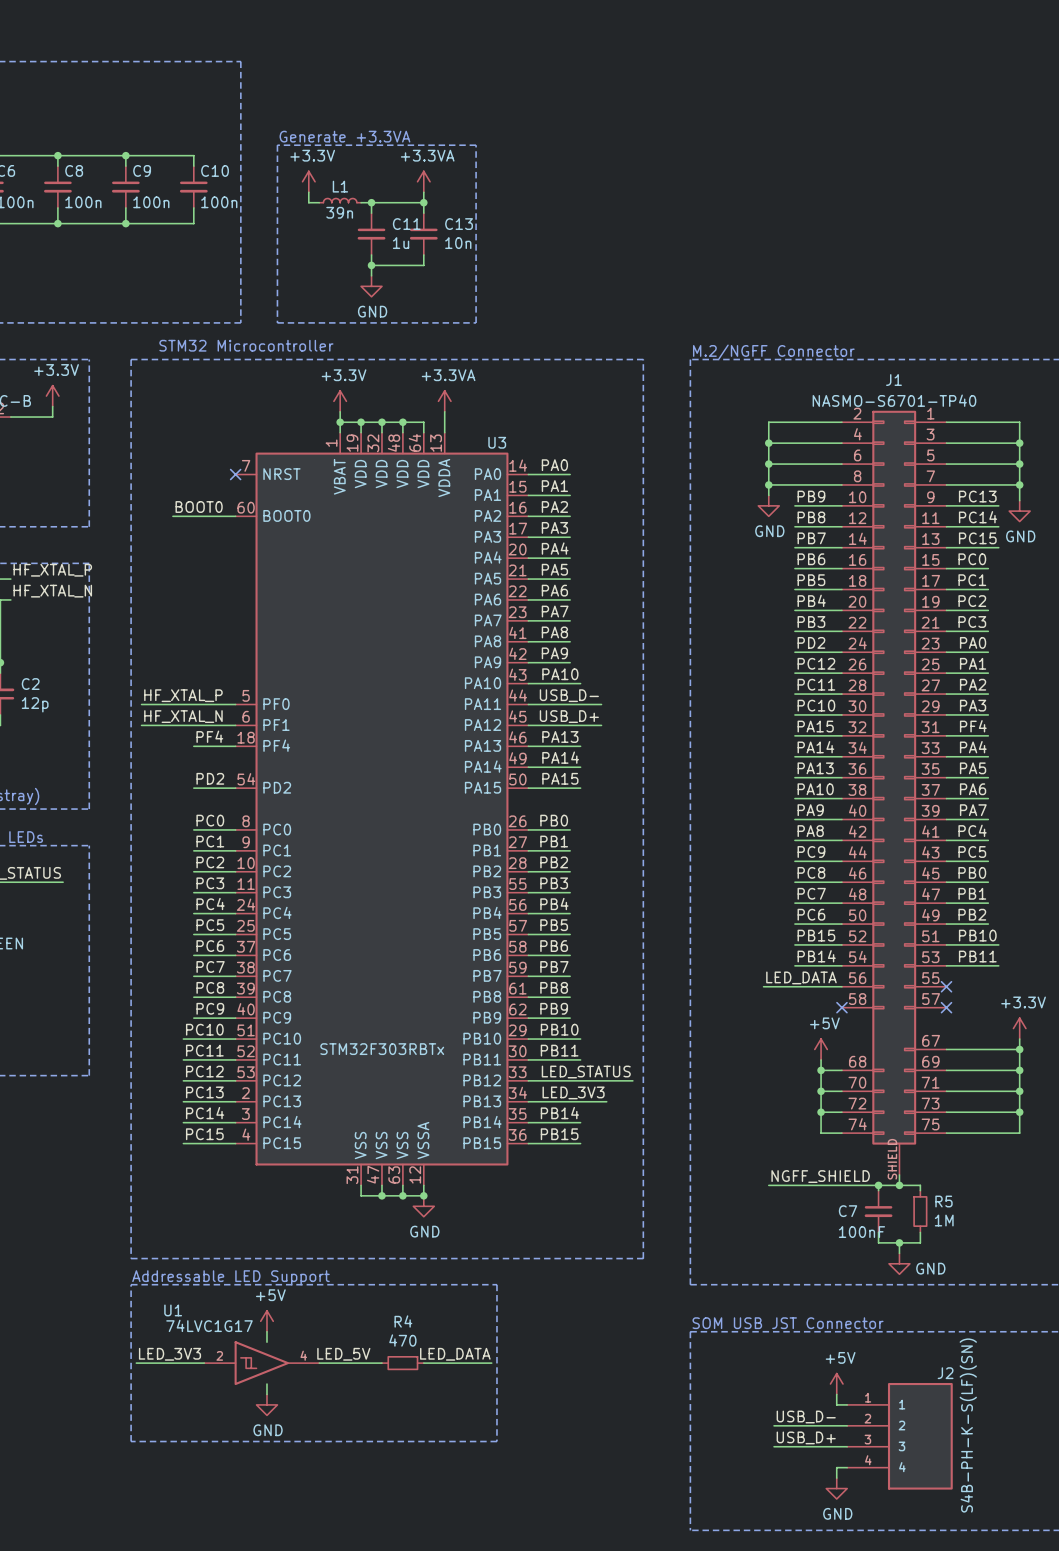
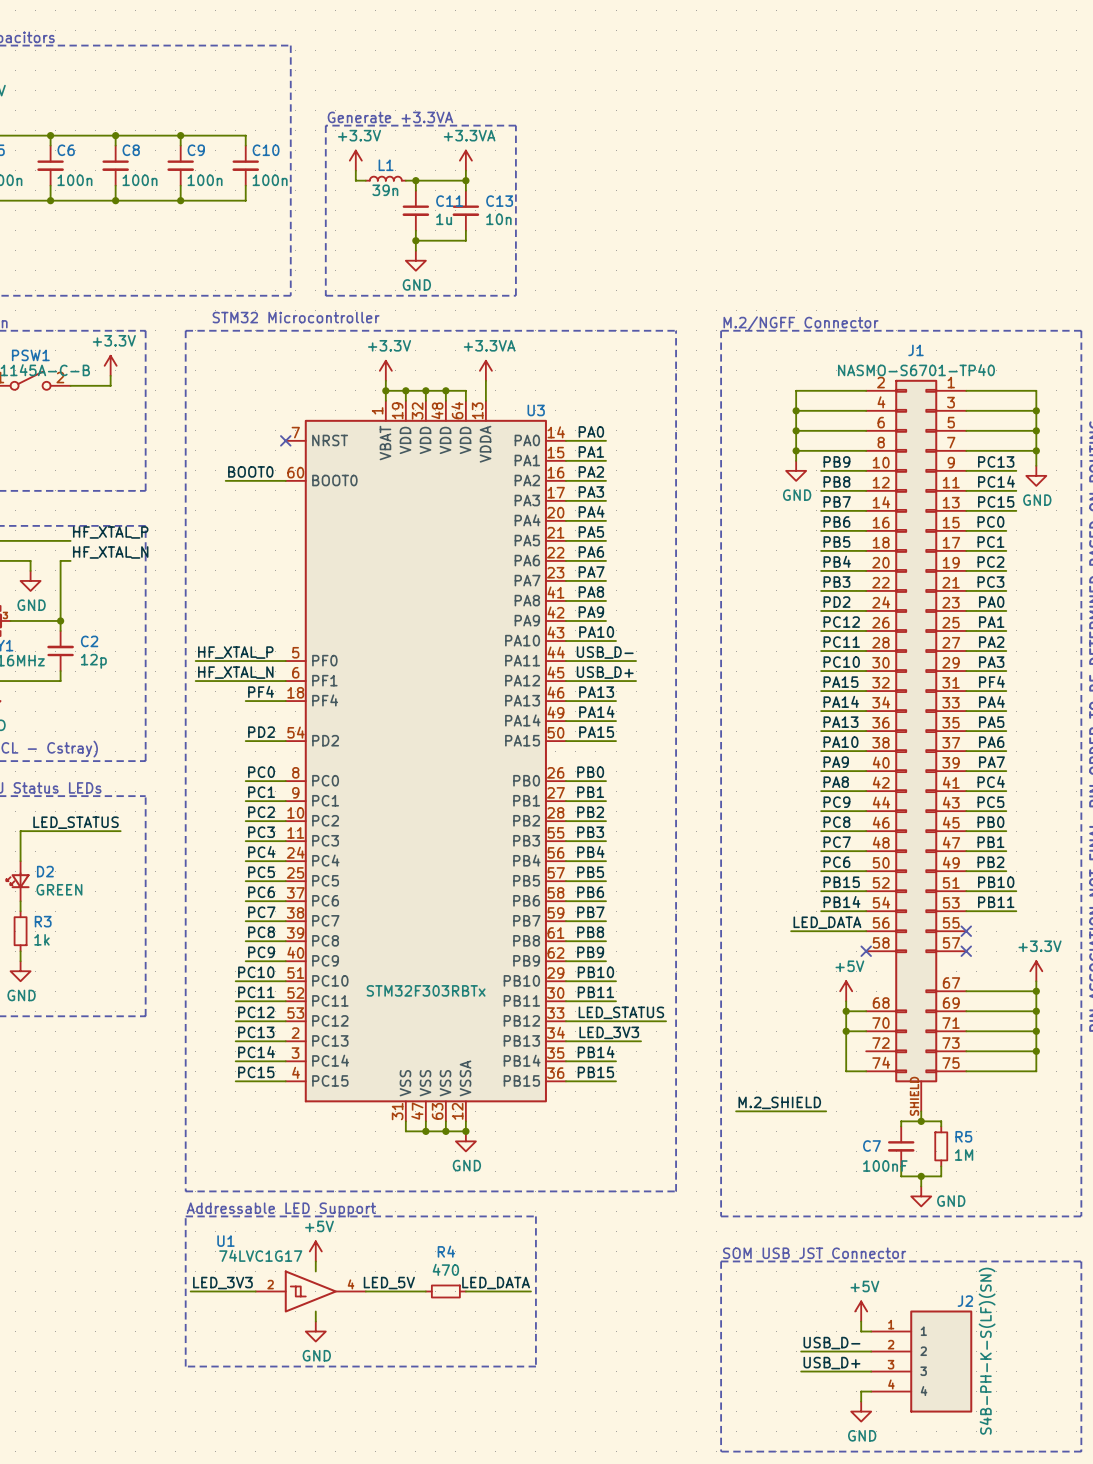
wire: (821, 1112) (841, 1112) -> none
junction: (821, 1112) -> none
wire: none -> (736, 1111) (826, 1111)
label: NGFF_SHIELD (820, 1176) -> M.2_SHIELD (779, 1102)
wire: (768, 1185) (878, 1185) -> none
junction: (878, 1185) -> none

